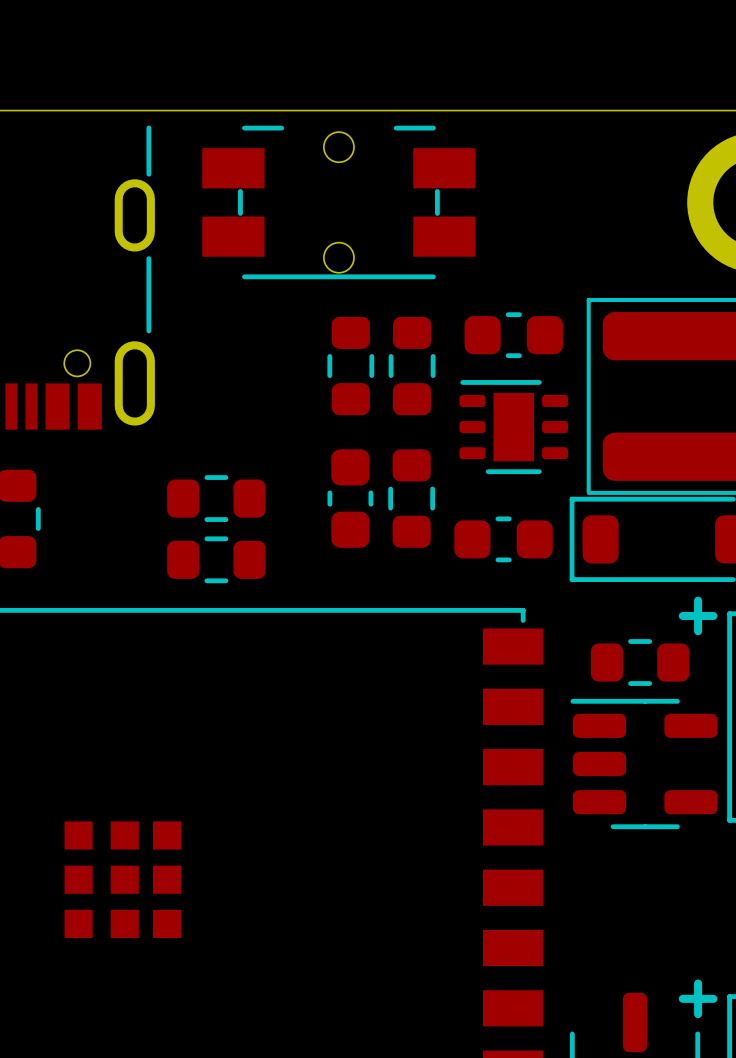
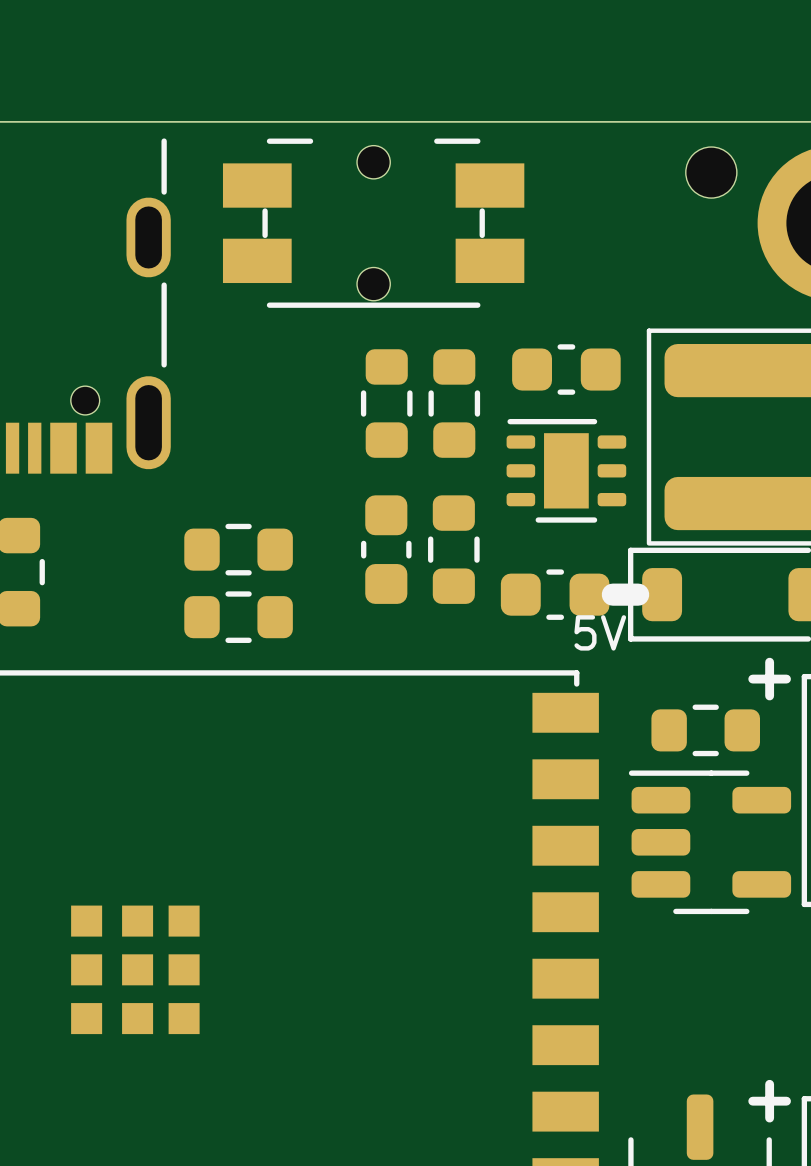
part: none -> (711, 172)
line: none -> (612, 594) (638, 594)
text: none -> 5V (600, 632)

